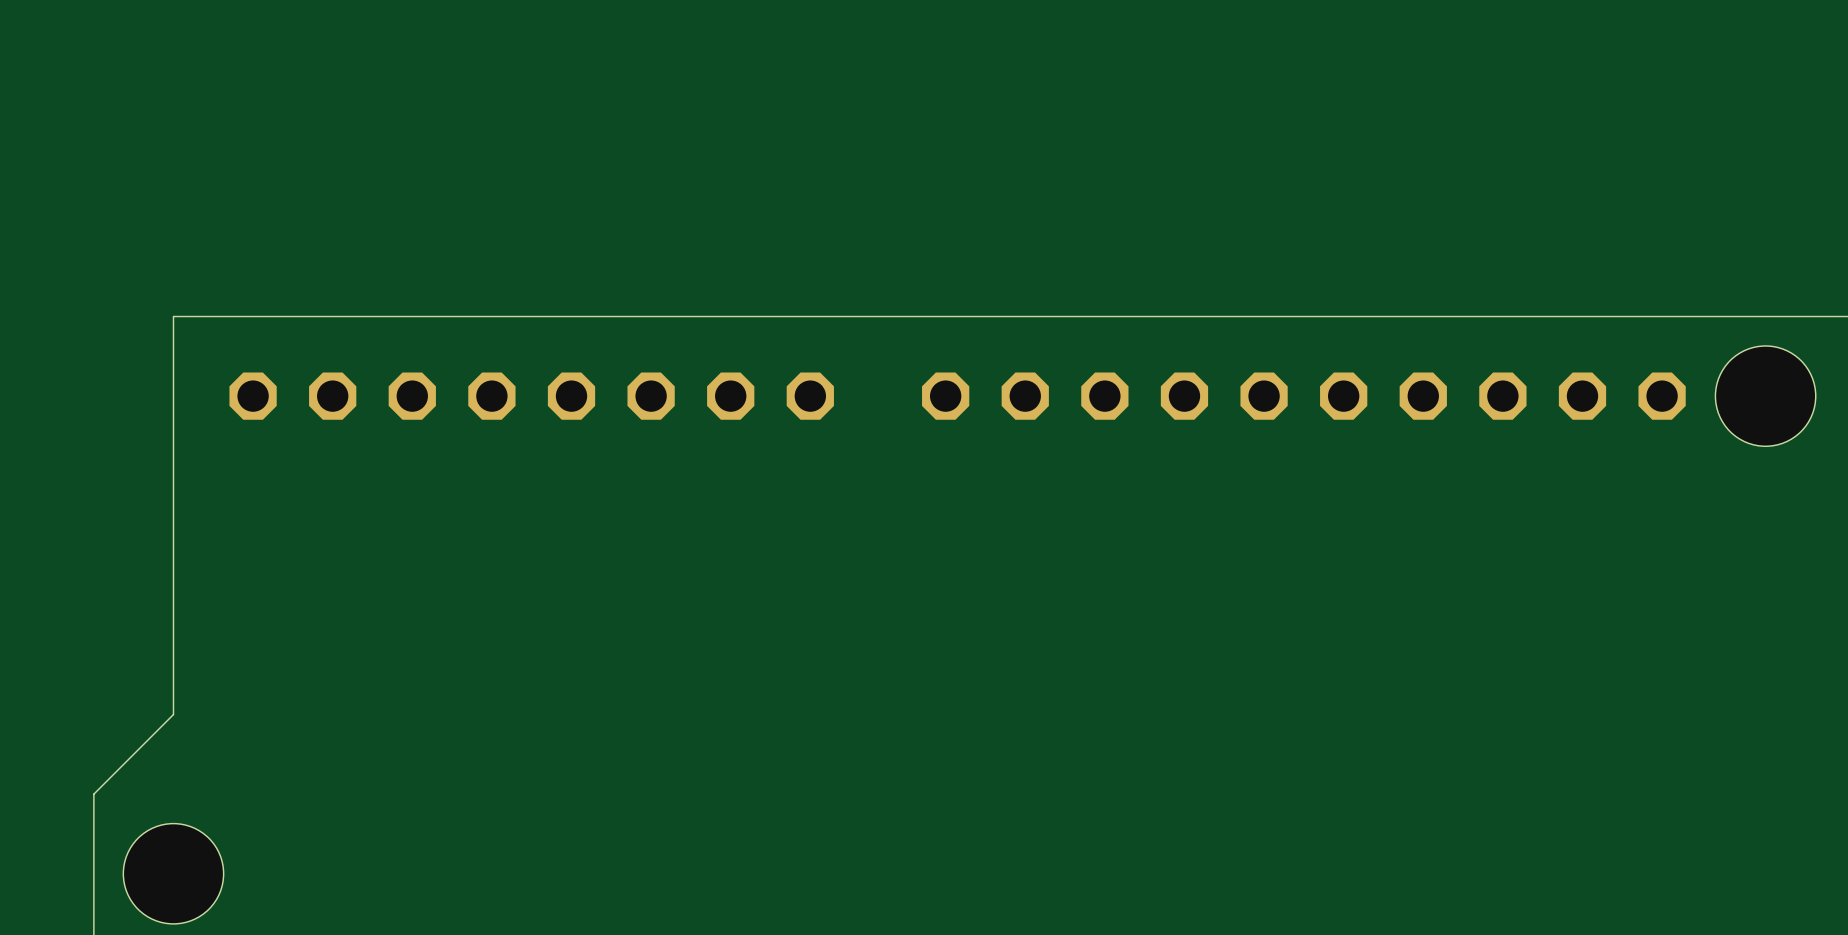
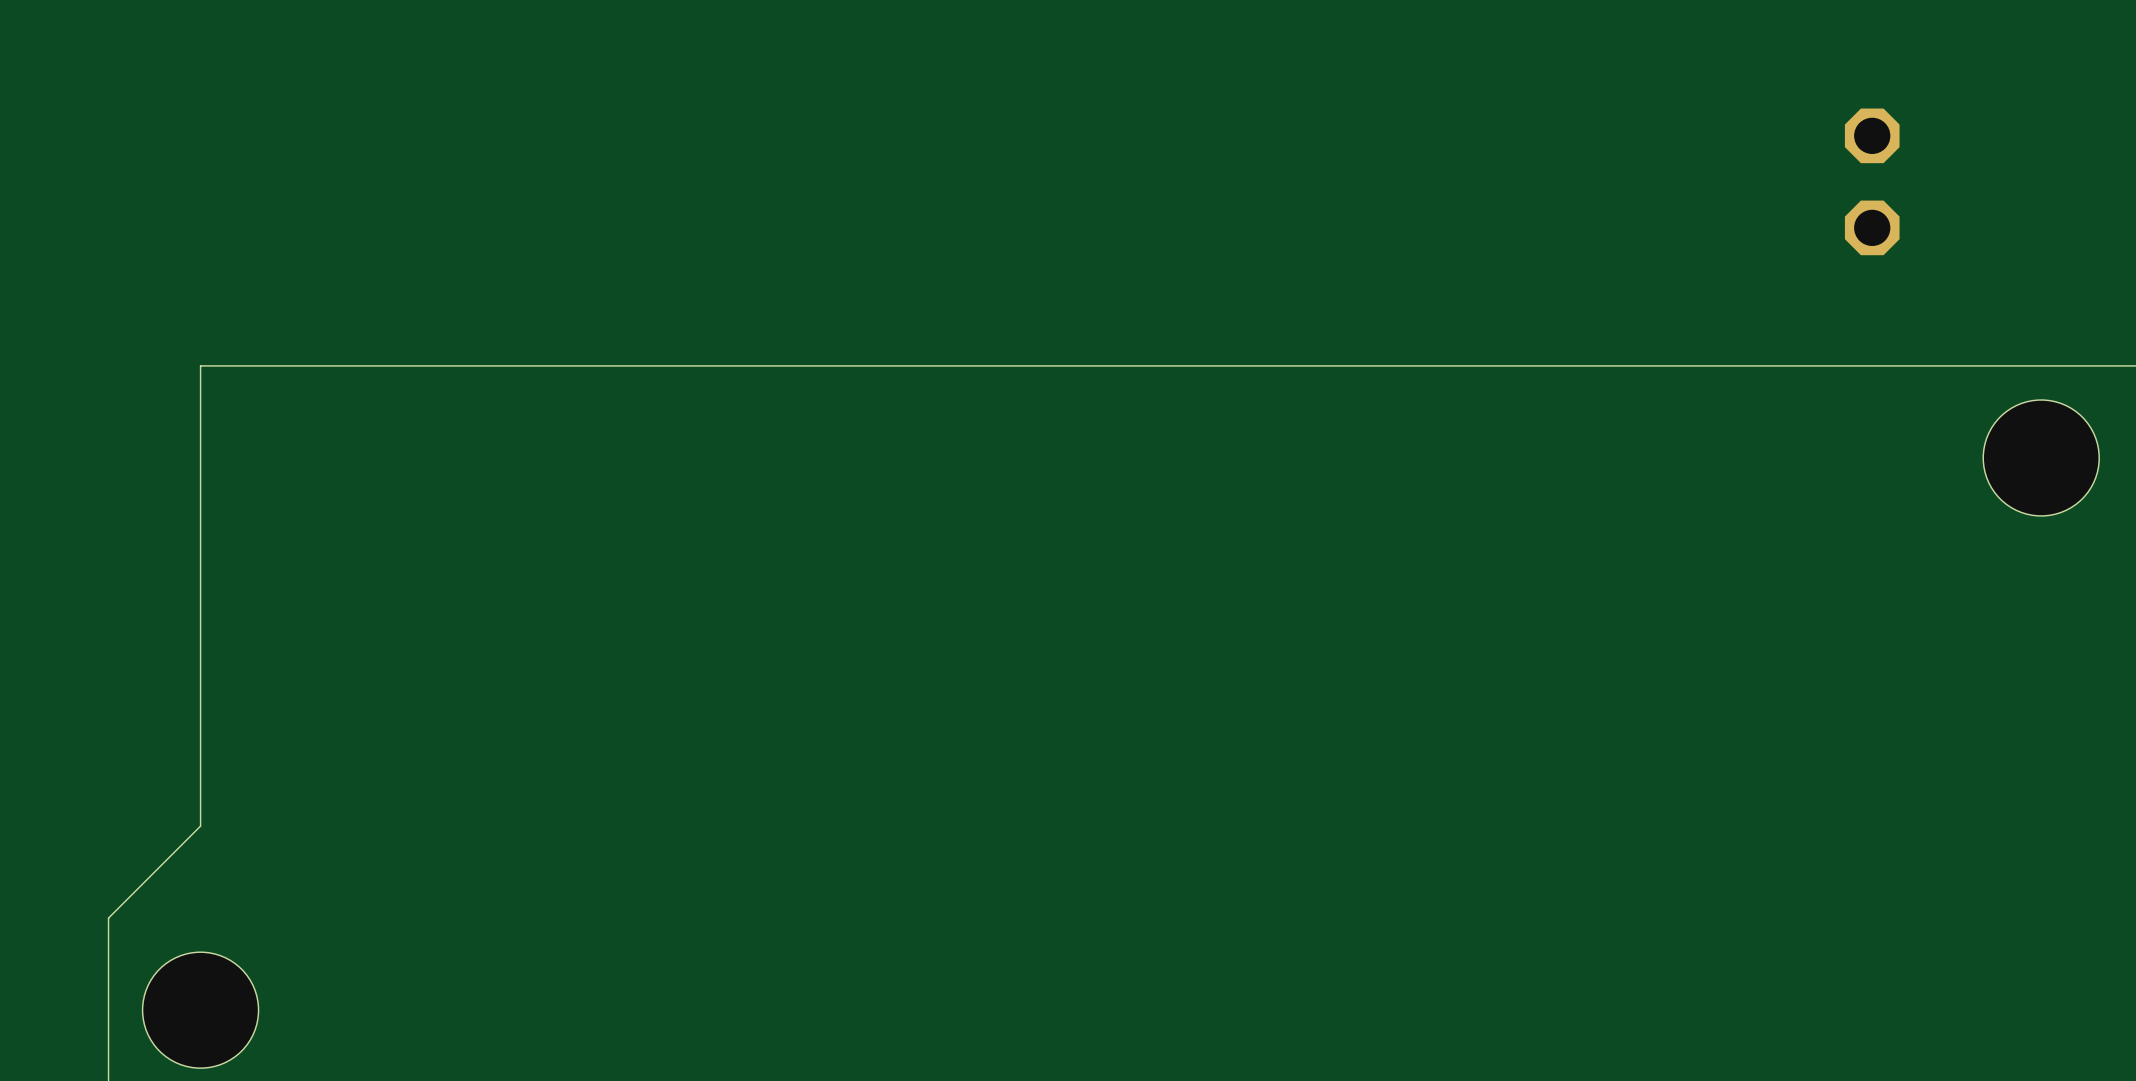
part: none -> (1872, 181)
part: (531, 396) -> none
part: (1303, 396) -> none

